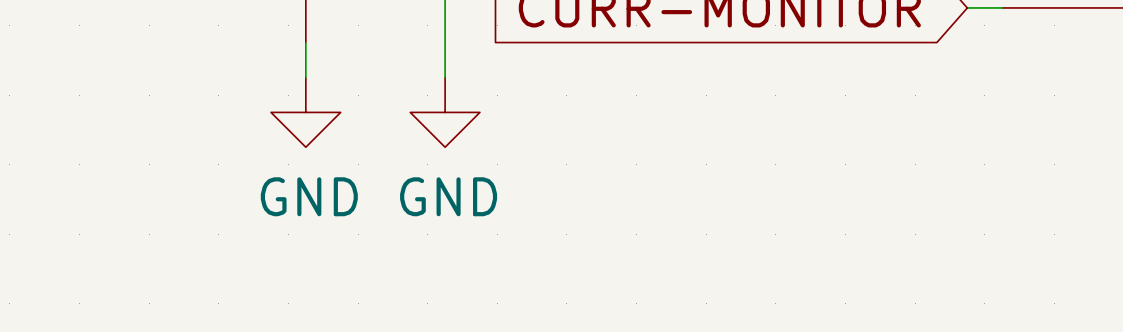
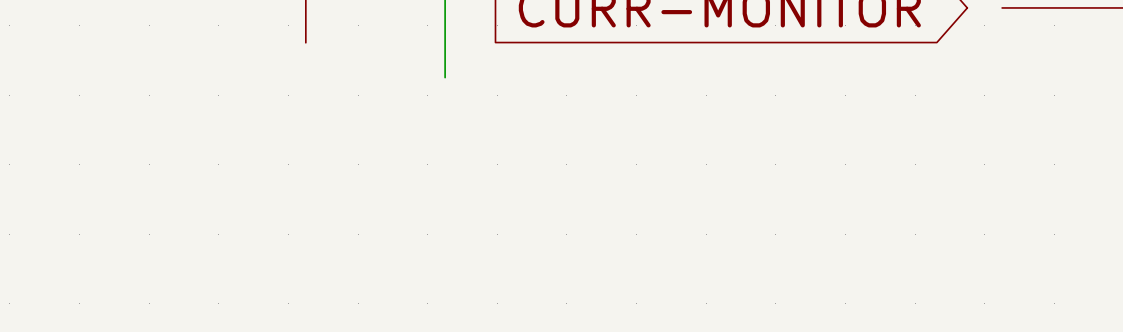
wire: (967, 7) (1002, 7) -> none
wire: (305, 42) (305, 77) -> none
power symbol: GND (305, 112) -> none
power symbol: GND (445, 112) -> none

